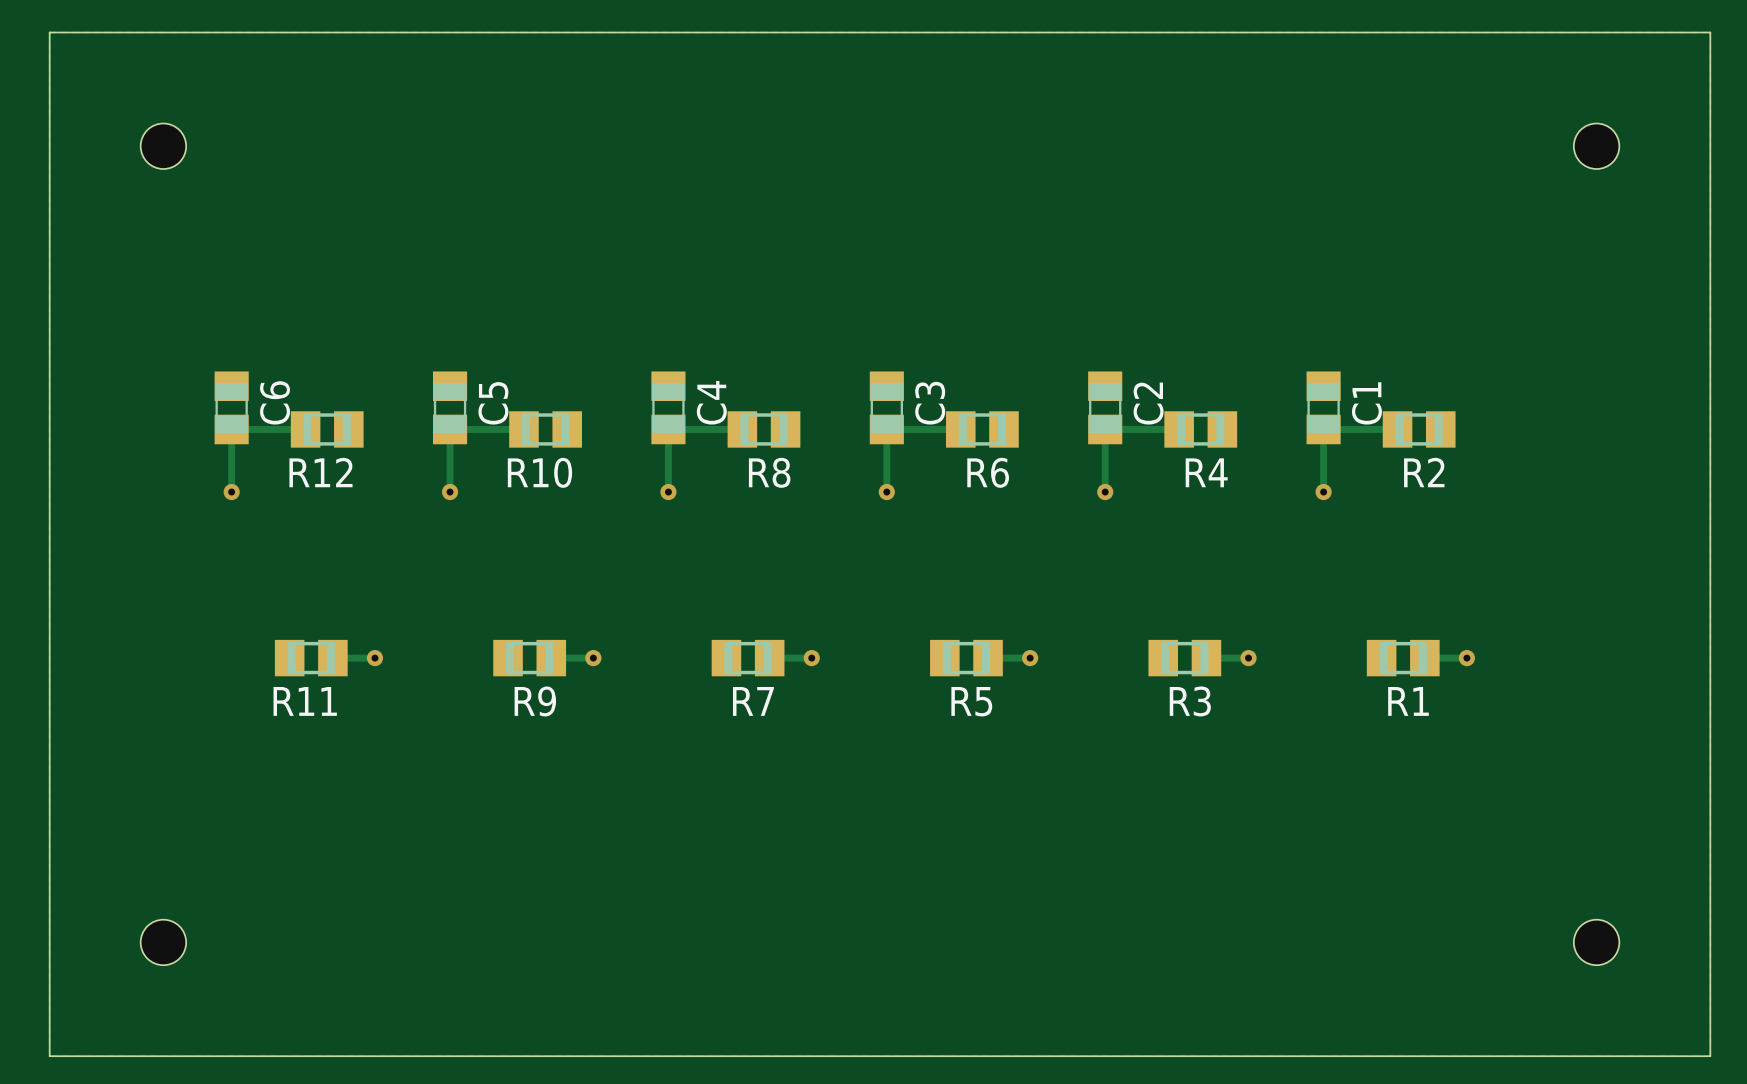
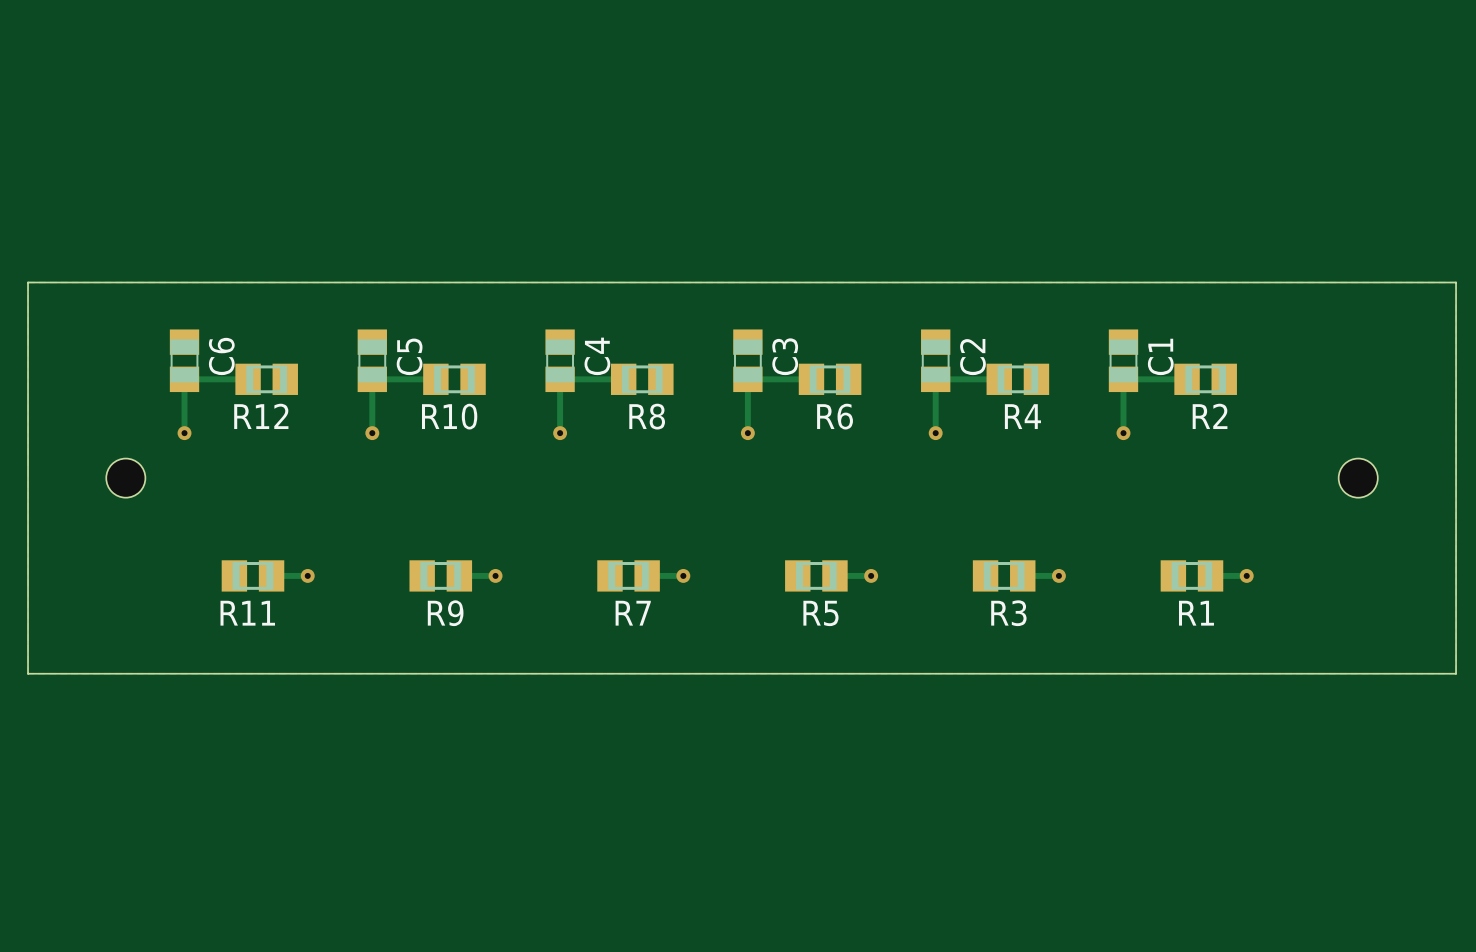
hole: (163, 146) -> none
hole: (1596, 146) -> none
board edge: (1710, 316) (1710, 32) (49, 32) (49, 316) -> (1456, 282) (28, 282)
hole: none -> (125, 478)
hole: none -> (1358, 478)
board edge: (1710, 771) (1710, 1056) (49, 1056) (49, 771) -> (1456, 673) (28, 673)
hole: (163, 942) -> none
hole: (1596, 942) -> none

